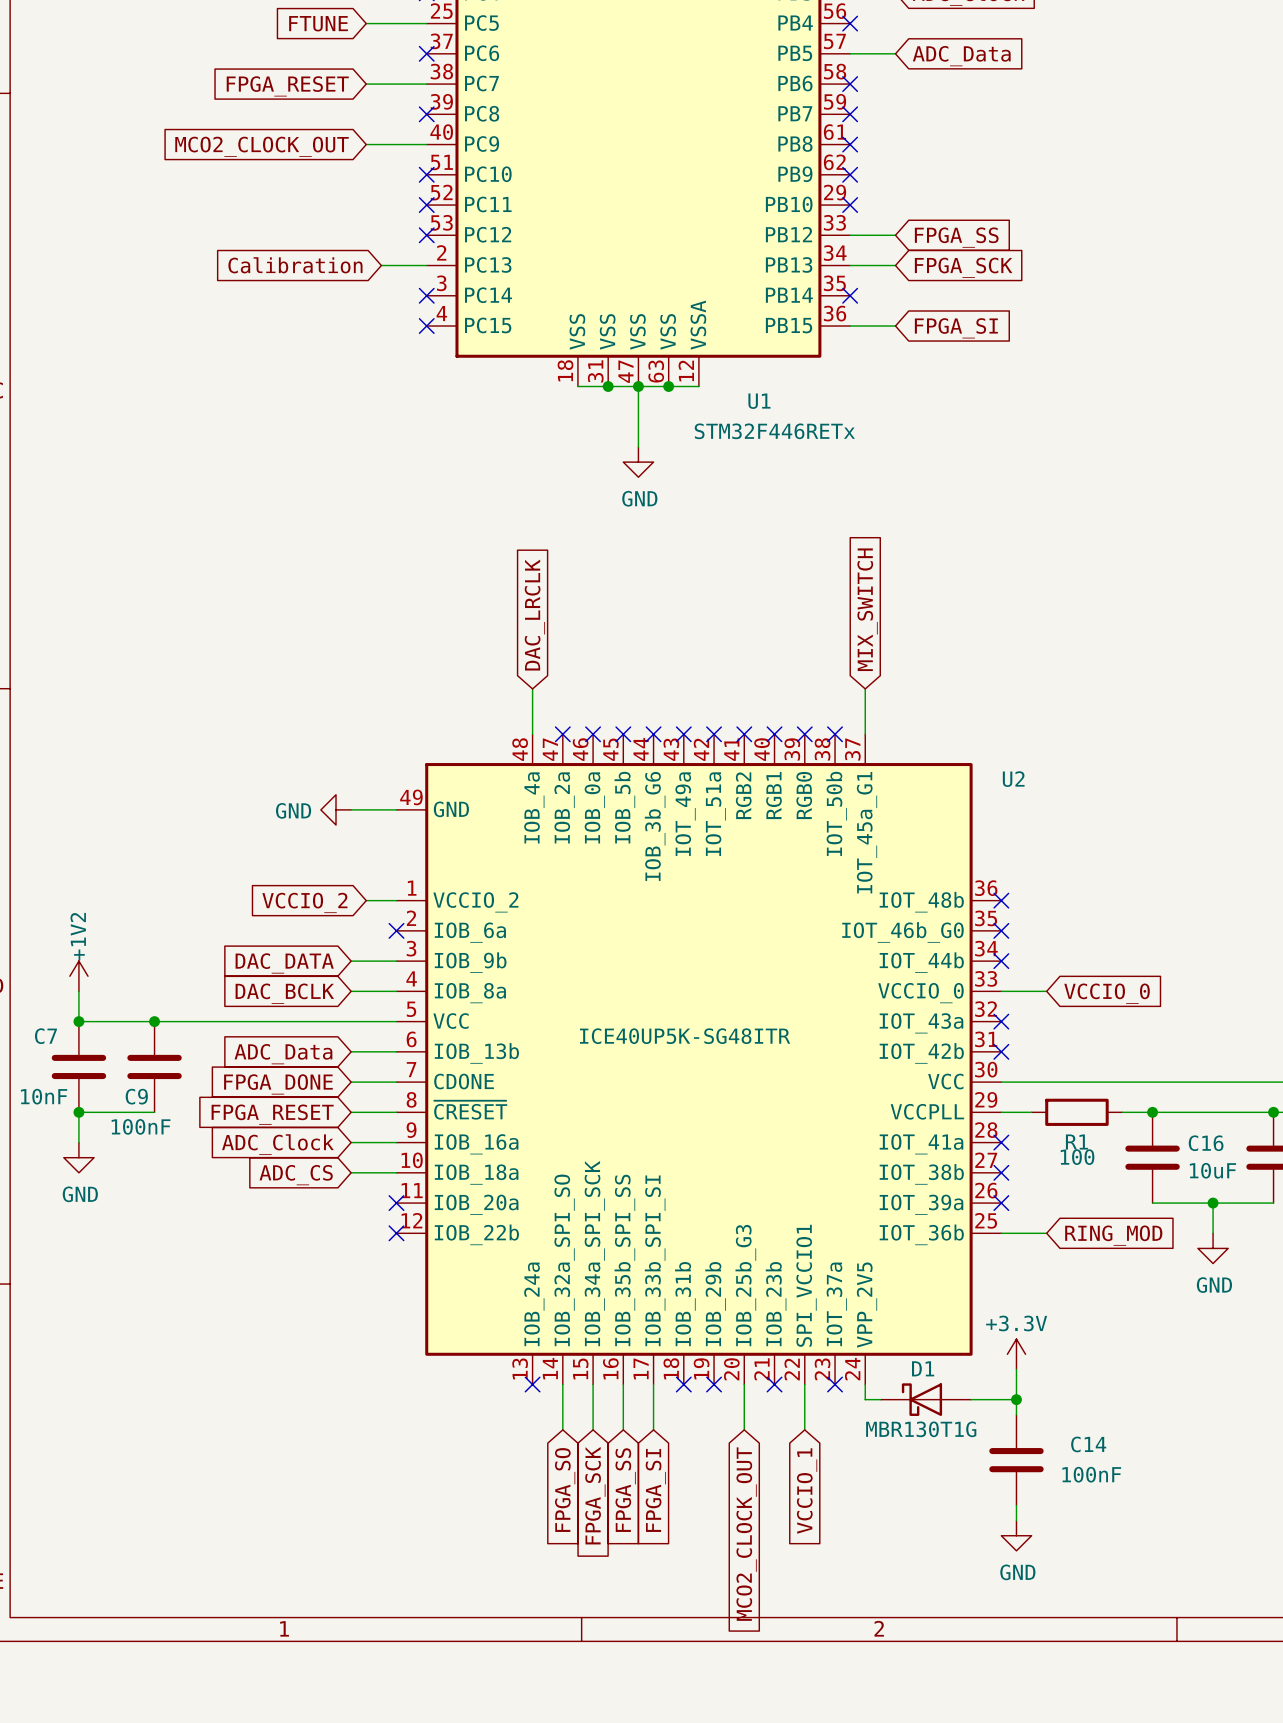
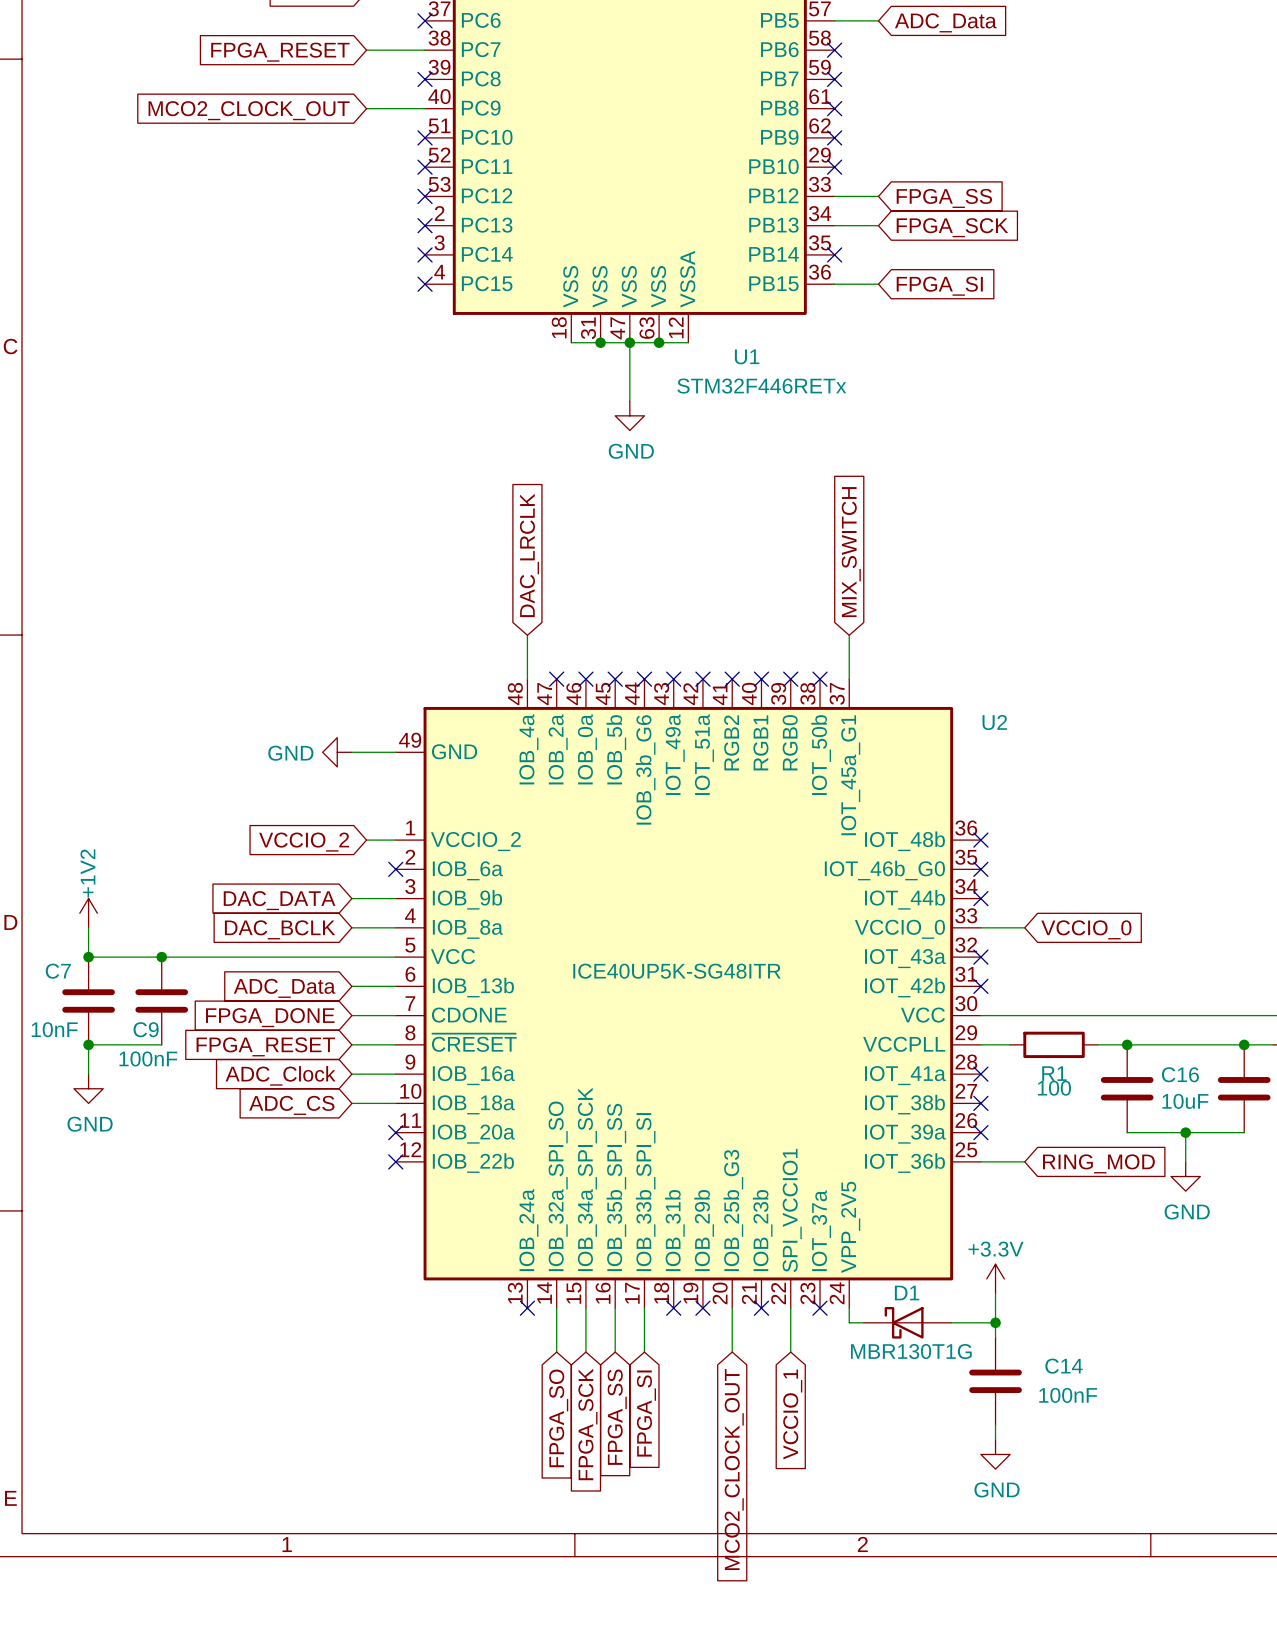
global label: Calibration (295, 265) -> none
wire: (381, 265) (426, 265) -> none
no-connect mark: none -> (425, 225)

